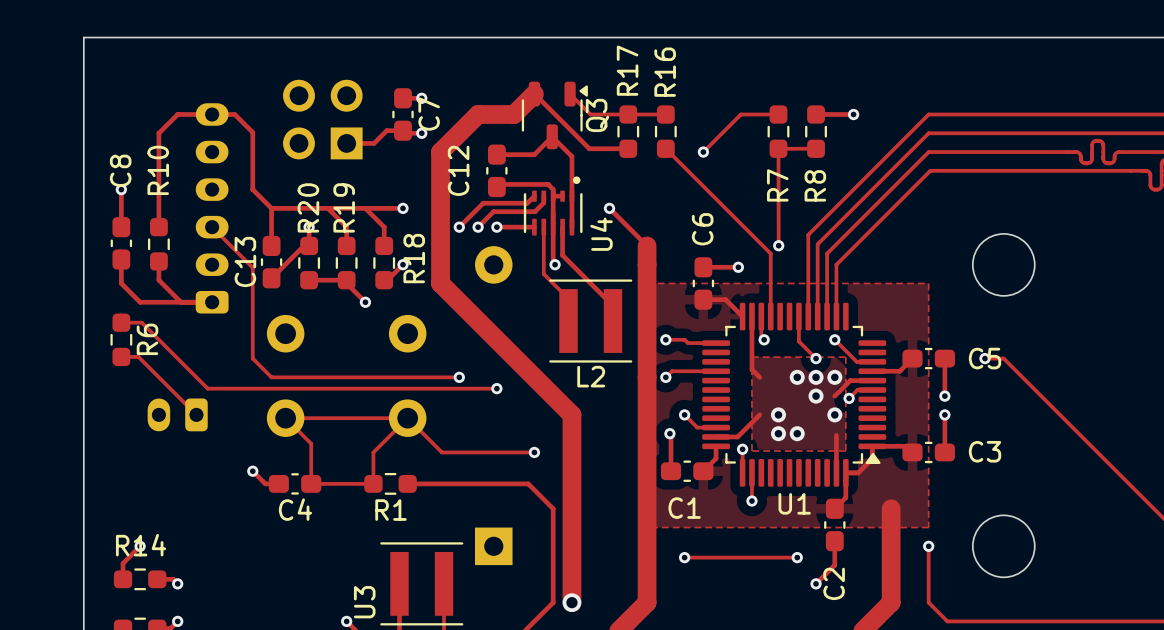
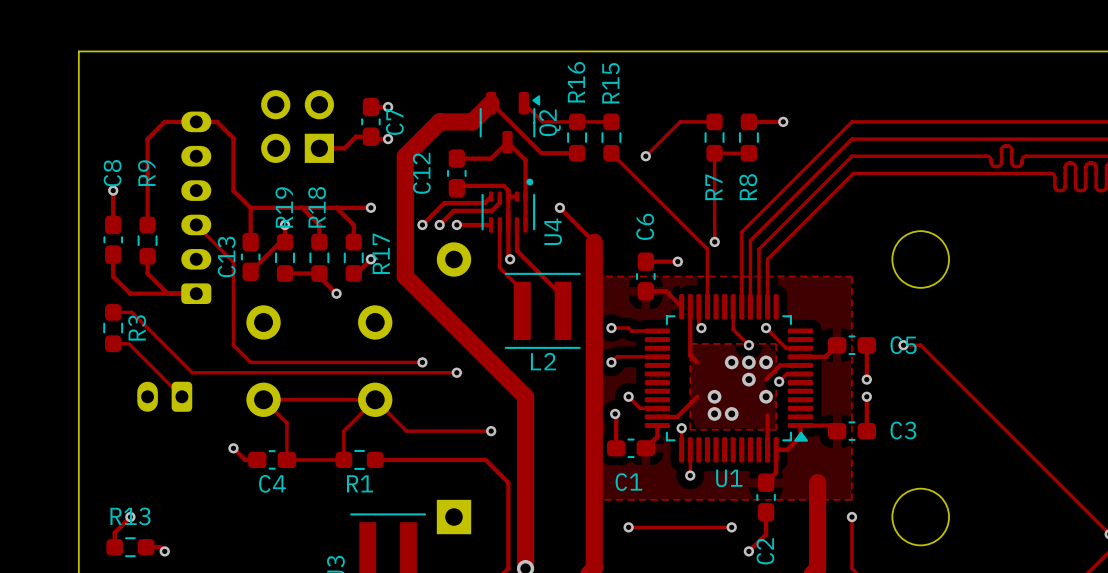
R17 name: R17 (627, 70) -> R16 (576, 82)
R16 name: R16 (665, 72) -> R15 (610, 83)
Q3 name: Q3 (597, 115) -> Q2 (549, 122)
R10 name: R10 (158, 170) -> R9 (146, 173)
R20 name: R20 (308, 207) -> R19 (284, 207)
R19 name: R19 (344, 207) -> R18 (317, 207)
R18 name: R18 (414, 258) -> R17 (381, 253)
R6 name: R6 (147, 339) -> R3 (137, 327)
R14 name: R14 (141, 545) -> R13 (130, 516)

